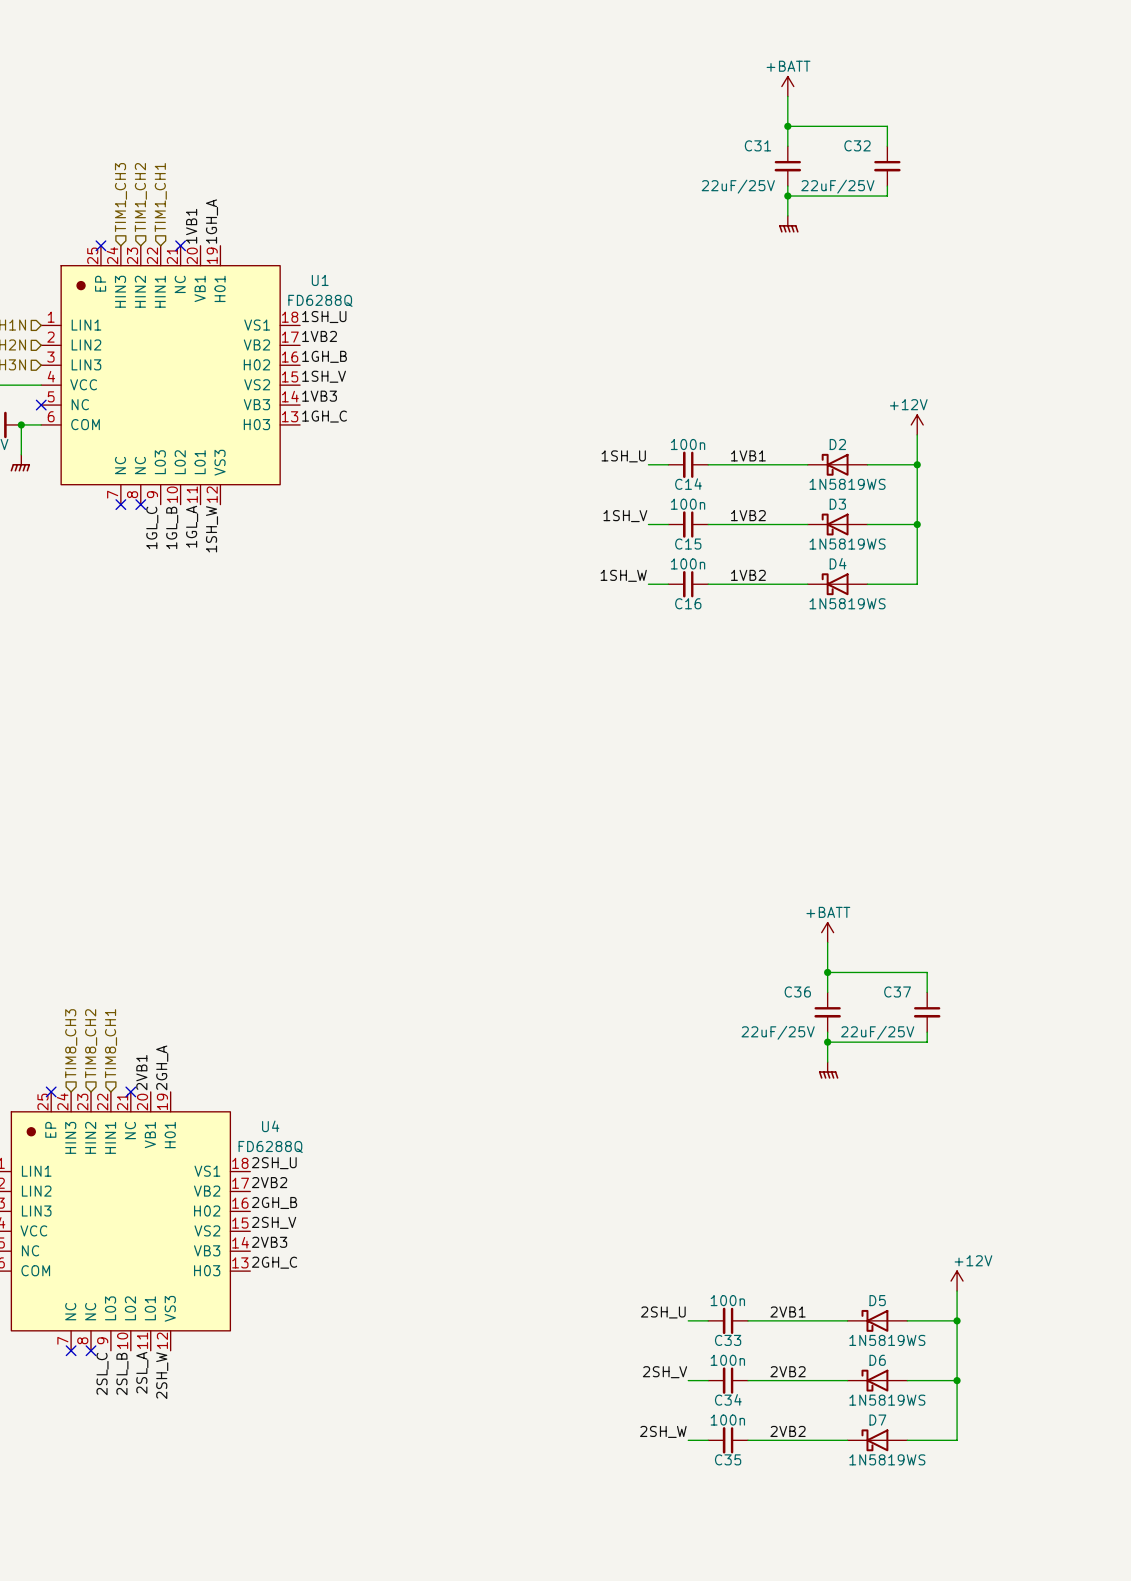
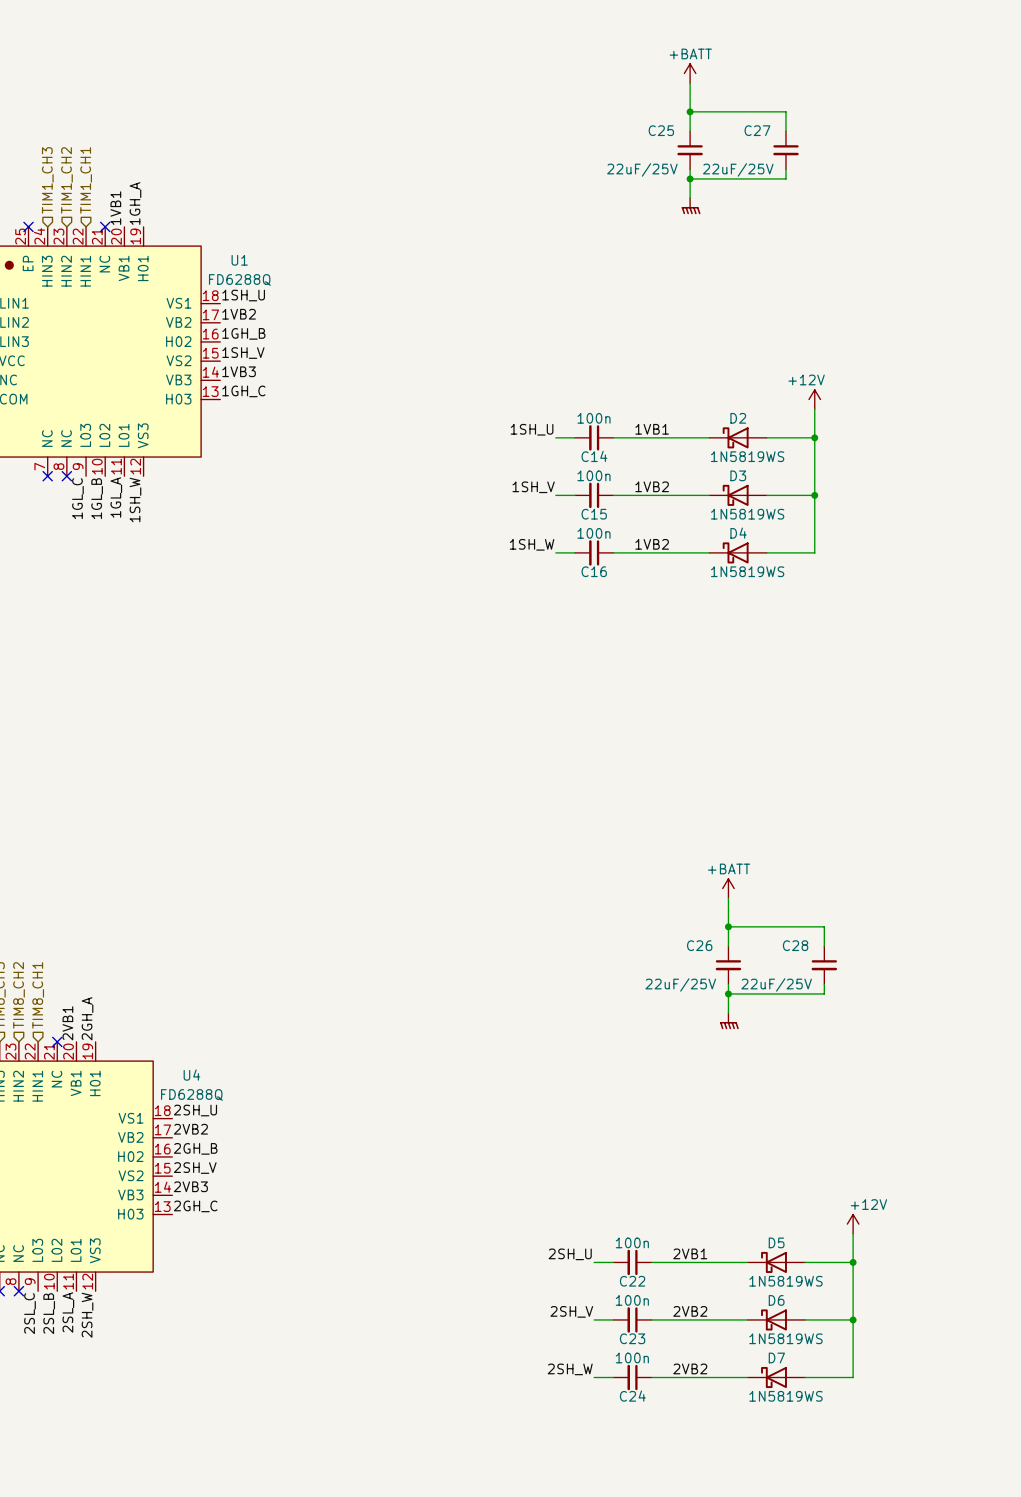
C31 name: C31 (757, 145) -> C25 (661, 130)
C32 name: C32 (857, 145) -> C27 (757, 130)
C36 name: C36 (797, 992) -> C26 (699, 945)
C37 name: C37 (897, 992) -> C28 (795, 945)
C33 name: C33 (728, 1340) -> C22 (632, 1281)
C34 name: C34 (728, 1399) -> C23 (632, 1338)
C35 name: C35 (728, 1459) -> C24 (632, 1396)

